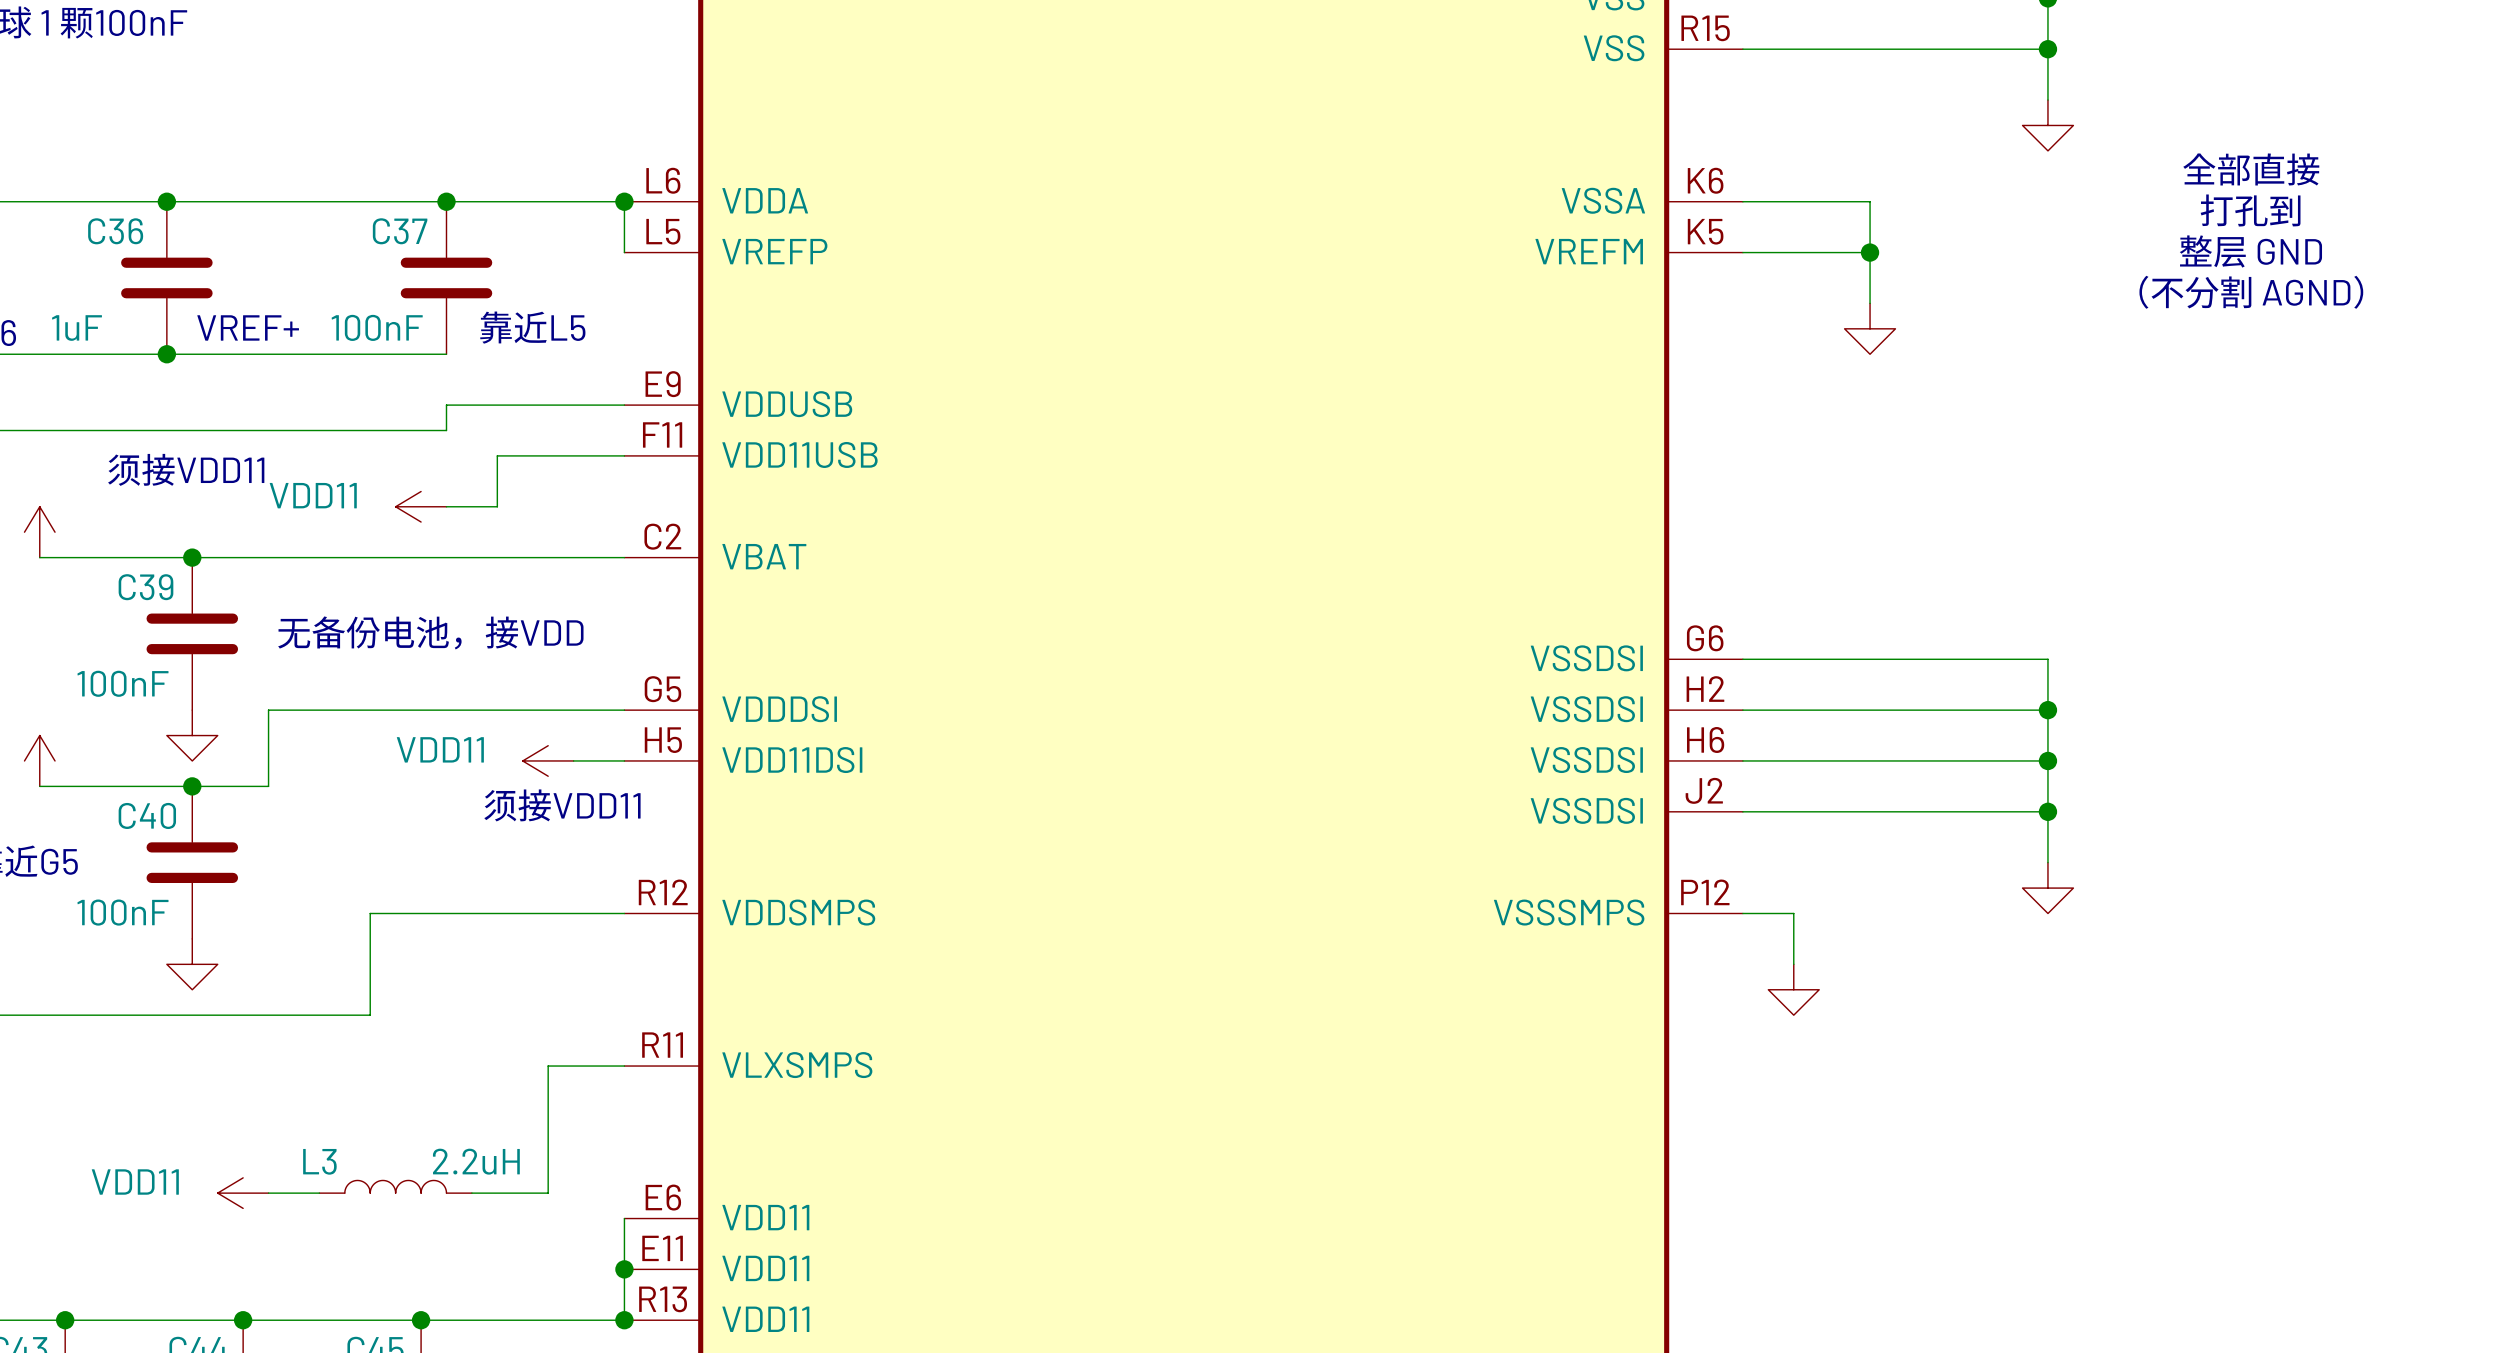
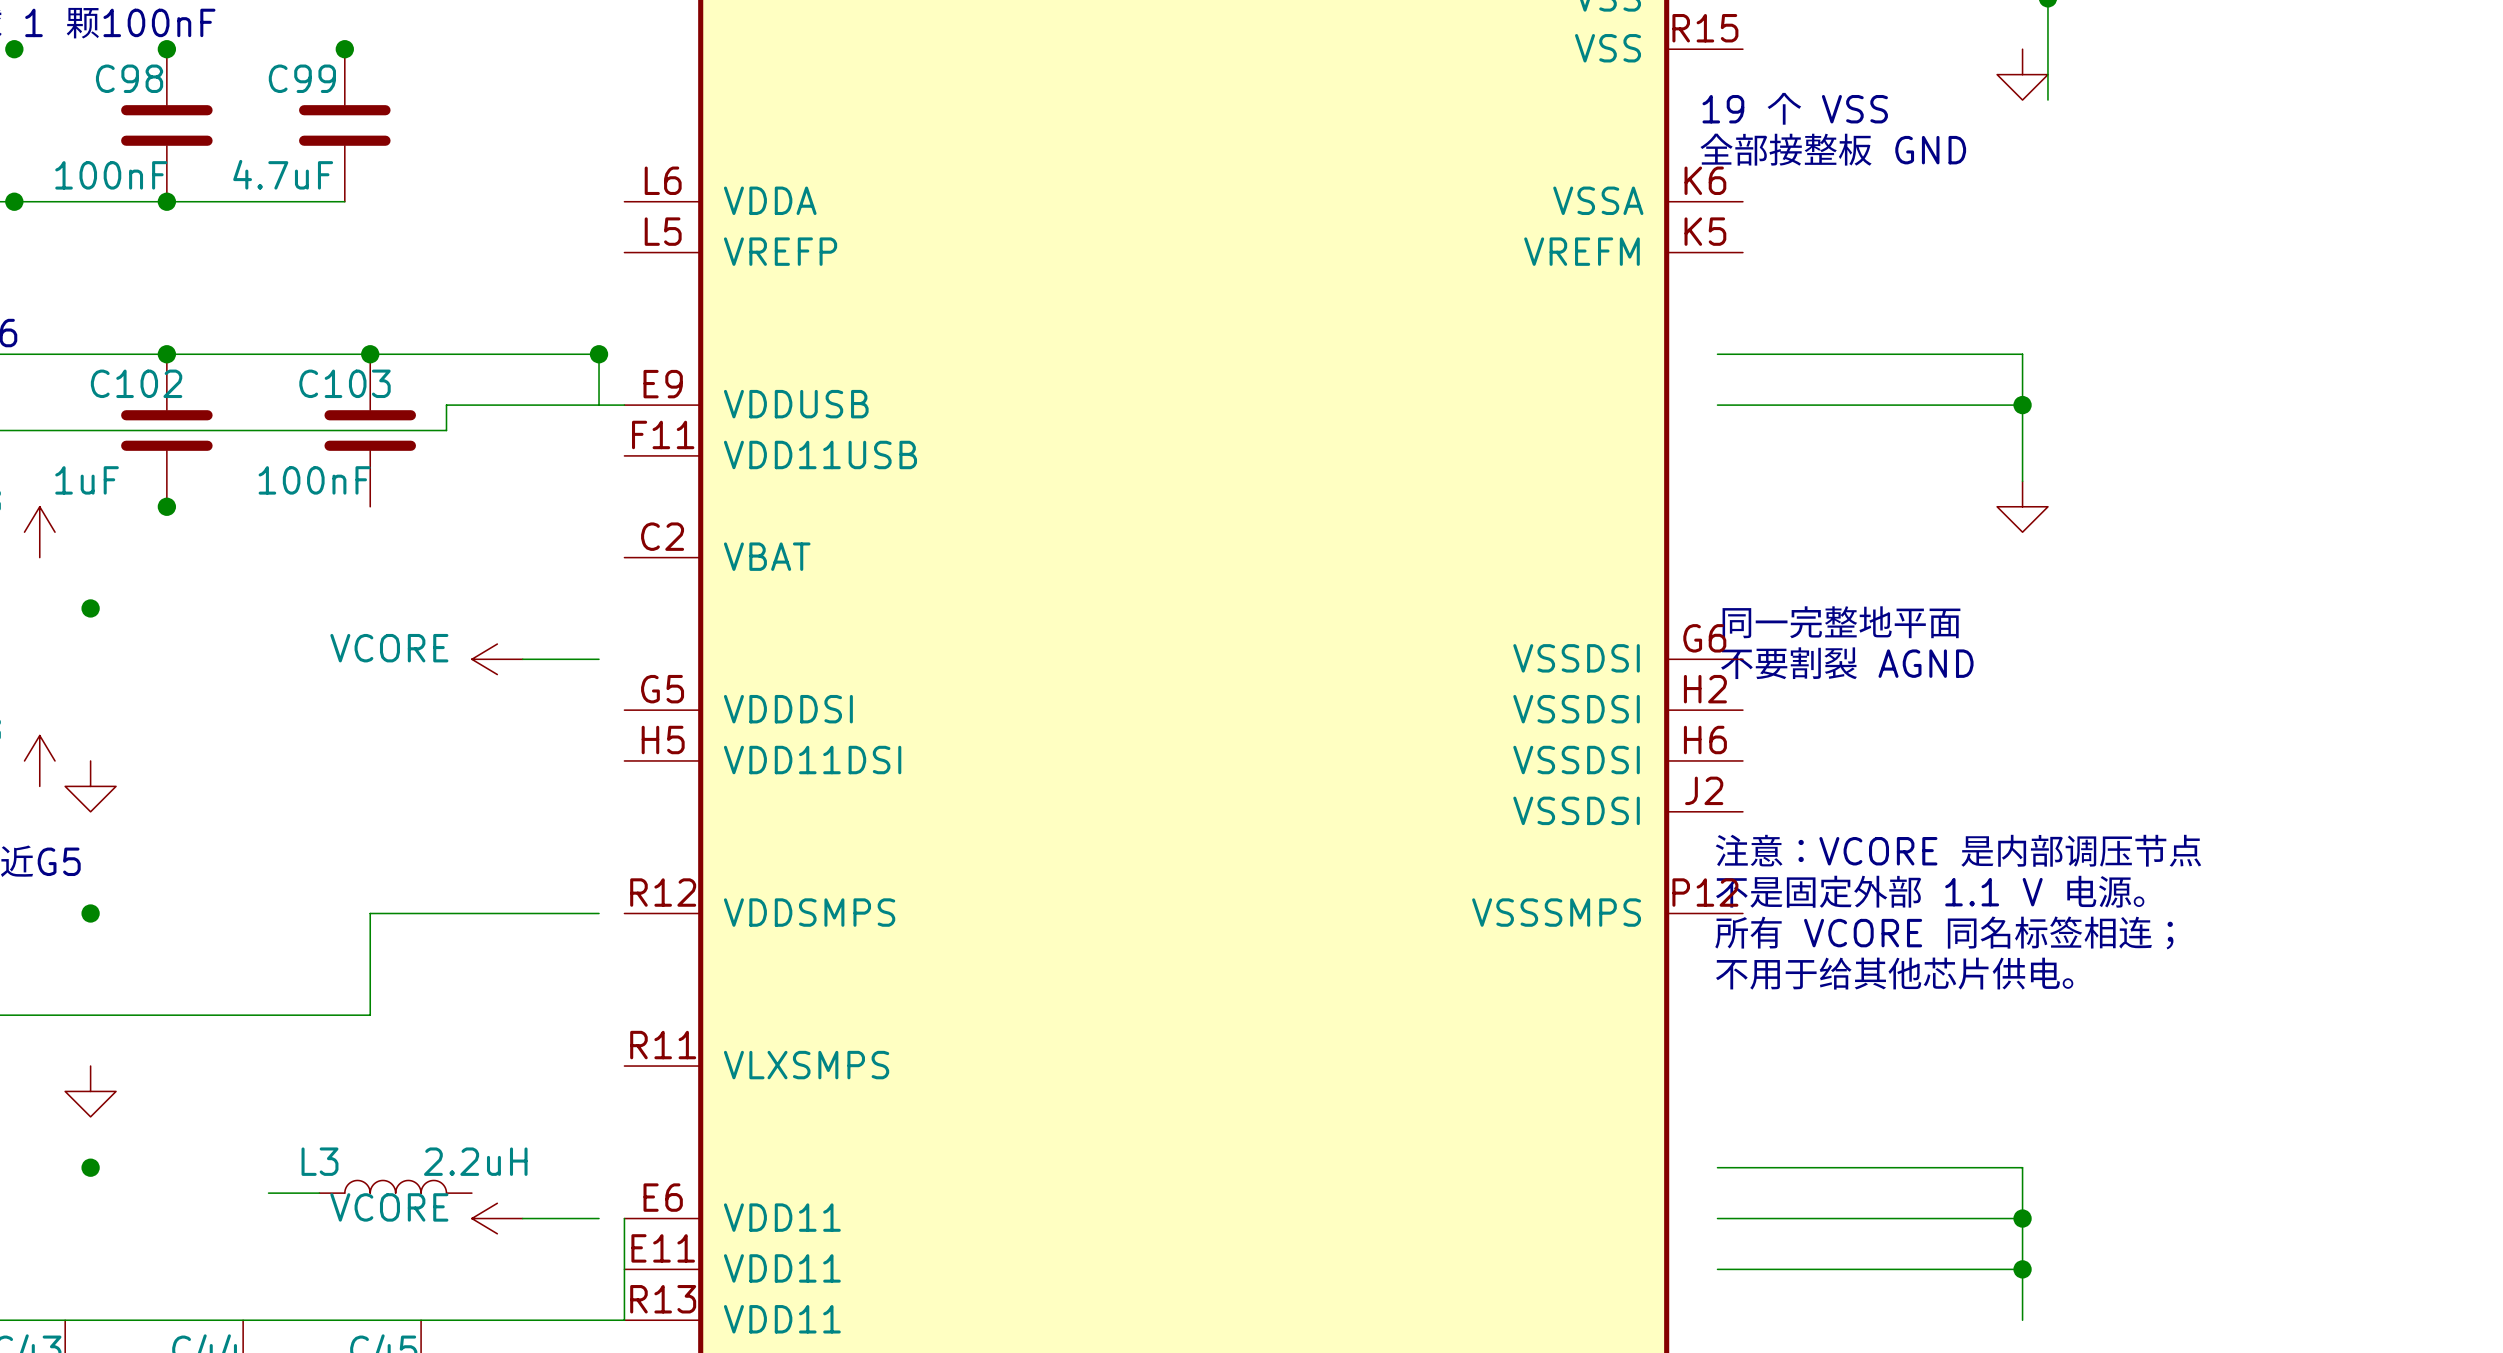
junction: none -> (14, 49)
junction: none -> (166, 49)
junction: none -> (344, 49)
wire: (1742, 49) (2047, 49) -> none
junction: (2047, 49) -> none
text: none -> 19 个 VSS (1795, 108)
C98: none -> 100nF (166, 125)
C99: none -> 4.7uF (344, 125)
power symbol position: (2047, 125) -> (2022, 74)
text: none -> 全部接整板 GND (1832, 149)
text: 全部直接 (2251, 169) -> none
junction: none -> (14, 201)
wire: (344, 201) (624, 201) (624, 252) -> none
junction: (446, 201) -> none
junction: (624, 201) -> none
wire: (1742, 201) (1870, 201) (1870, 303) -> none
text: 打孔到 (2250, 210) -> none
text: 整层 GND (2250, 251) -> none
wire: (1742, 252) (1870, 252) -> none
junction: (1870, 252) -> none
C36: 1uF (166, 277) -> none
C37: 100nF (446, 277) -> none
text: （不分割 AGND） (2251, 292) -> none
text: VREF+ (248, 327) -> none
text: 靠近L5 (532, 327) -> none
power symbol: (1870, 328) -> none
junction: none -> (370, 354)
wire: none -> (446, 354) (599, 354) (599, 405)
junction: none -> (599, 354)
wire: none -> (1717, 354) (2022, 354) (2022, 481)
junction: none -> (2022, 405)
C102: none -> 1uF (166, 430)
C103: none -> 100nF (370, 430)
wire: (624, 455) (497, 455) (497, 506) (446, 506) -> none
text: 须接VDD11 (186, 469) -> none
junction: none -> (166, 506)
power symbol: VDD11 (421, 506) -> none
power symbol: none -> (2022, 506)
wire: (39, 557) (624, 557) -> none
junction: (192, 557) -> none
junction: none -> (90, 608)
text: none -> 同一完整地平面 (1841, 622)
text: 无备份电池，接VDD (430, 632) -> none
C39: 100nF (192, 633) -> none
power symbol: none -> VCORE (497, 659)
wire: none -> (522, 659) (599, 659)
wire: (1742, 659) (2047, 659) (2047, 862) -> none
text: none -> 不要割裂 AGND (1846, 663)
wire: (624, 710) (268, 710) (268, 786) (39, 786) -> none
wire: (1742, 710) (2047, 710) -> (1717, 405) (2022, 405)
junction: (2047, 710) -> none
power symbol: (192, 735) -> none
power symbol: VDD11 (548, 760) -> none
wire: (573, 760) (624, 760) -> none
wire: (1742, 760) (2047, 760) -> (1717, 1218) (2022, 1218)
junction: (2047, 760) -> none
power symbol: none -> (90, 786)
junction: (192, 786) -> none
text: 须接VDD11 (562, 805) -> none
wire: (1742, 811) (2047, 811) -> (1717, 1269) (2022, 1269)
junction: (2047, 811) -> none
text: none -> 注意：VCORE 是内部调压节点 (1958, 850)
C40: 100nF (192, 862) -> none
power symbol: (2047, 888) -> none
text: none -> 不是固定外部 1.1 V 电源。 (1930, 891)
junction: none -> (90, 913)
wire: (599, 913) (624, 913) -> none
wire: (1742, 913) (1793, 913) (1793, 964) -> none
text: none -> 所有 VCORE 同名标签相连； (1944, 932)
power symbol: (192, 964) -> none
text: none -> 不用于给其他芯片供电。 (1894, 973)
power symbol: (1793, 989) -> none
wire: (624, 1066) (548, 1066) (548, 1193) (471, 1193) -> none
power symbol: none -> (90, 1091)
junction: none -> (90, 1167)
wire: none -> (1717, 1167) (2022, 1167) (2022, 1320)
power symbol: VDD11 (243, 1193) -> none
power symbol: none -> VCORE (497, 1218)
wire: none -> (522, 1218) (599, 1218)
junction: none -> (2022, 1218)
junction: (624, 1269) -> none
junction: none -> (2022, 1269)
junction: (65, 1320) -> none
junction: (243, 1320) -> none
junction: (421, 1320) -> none
junction: (624, 1320) -> none

